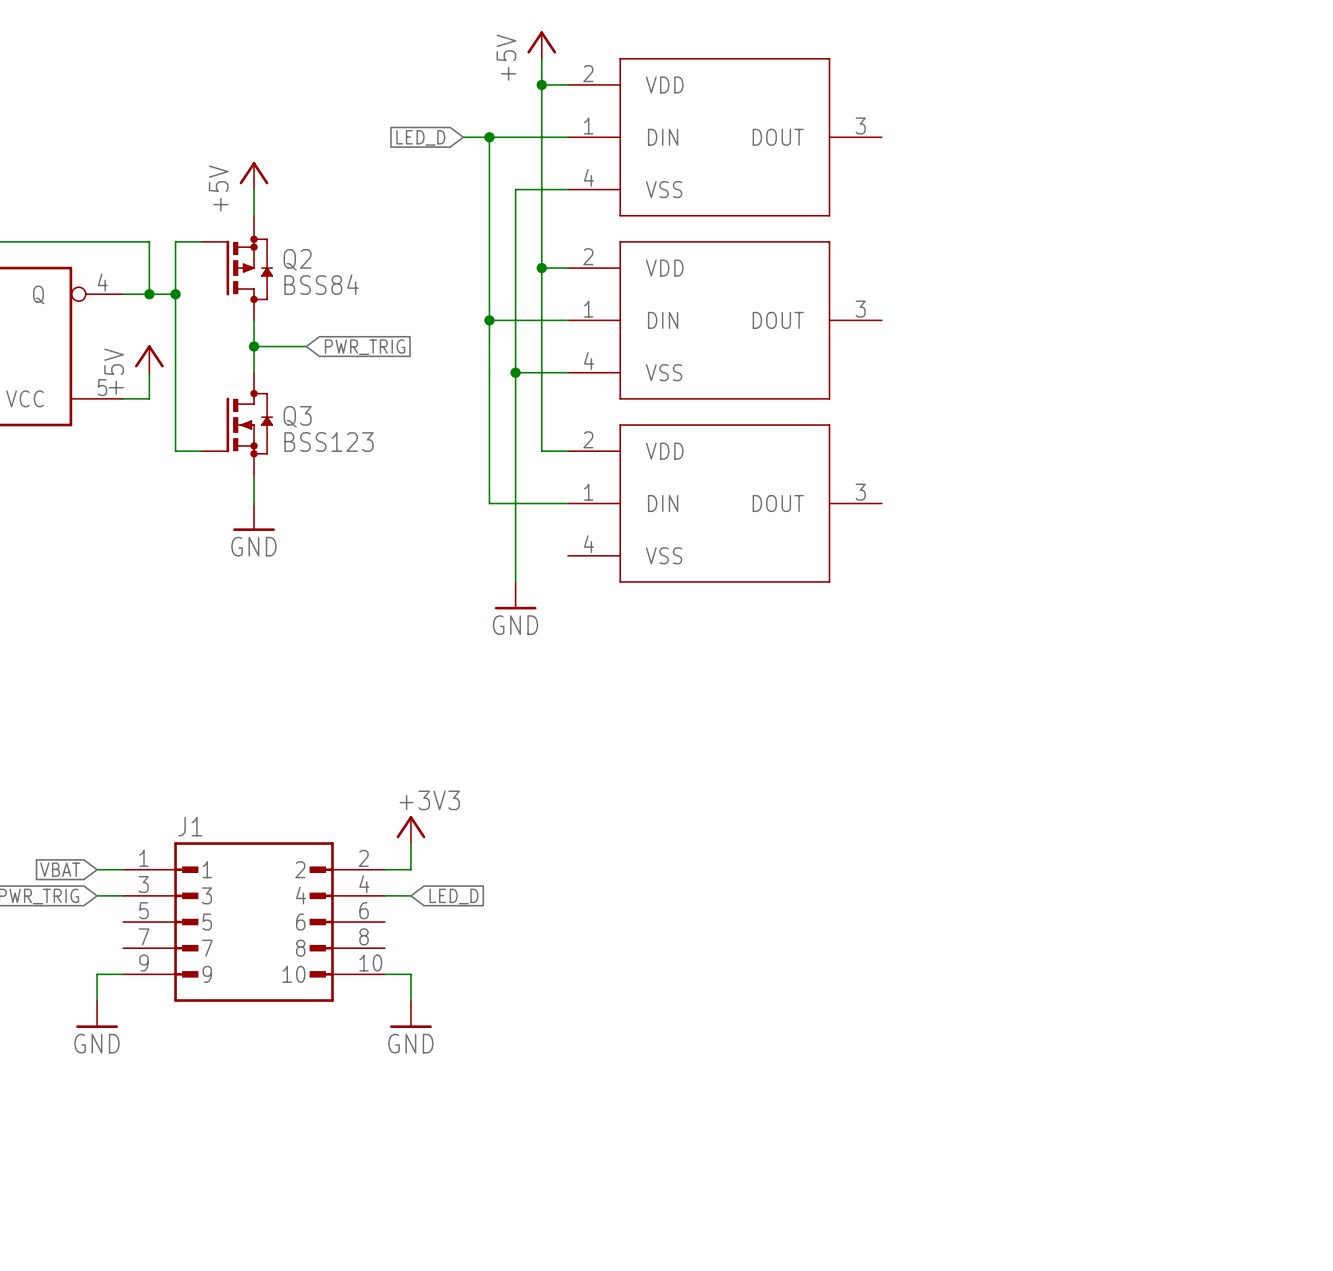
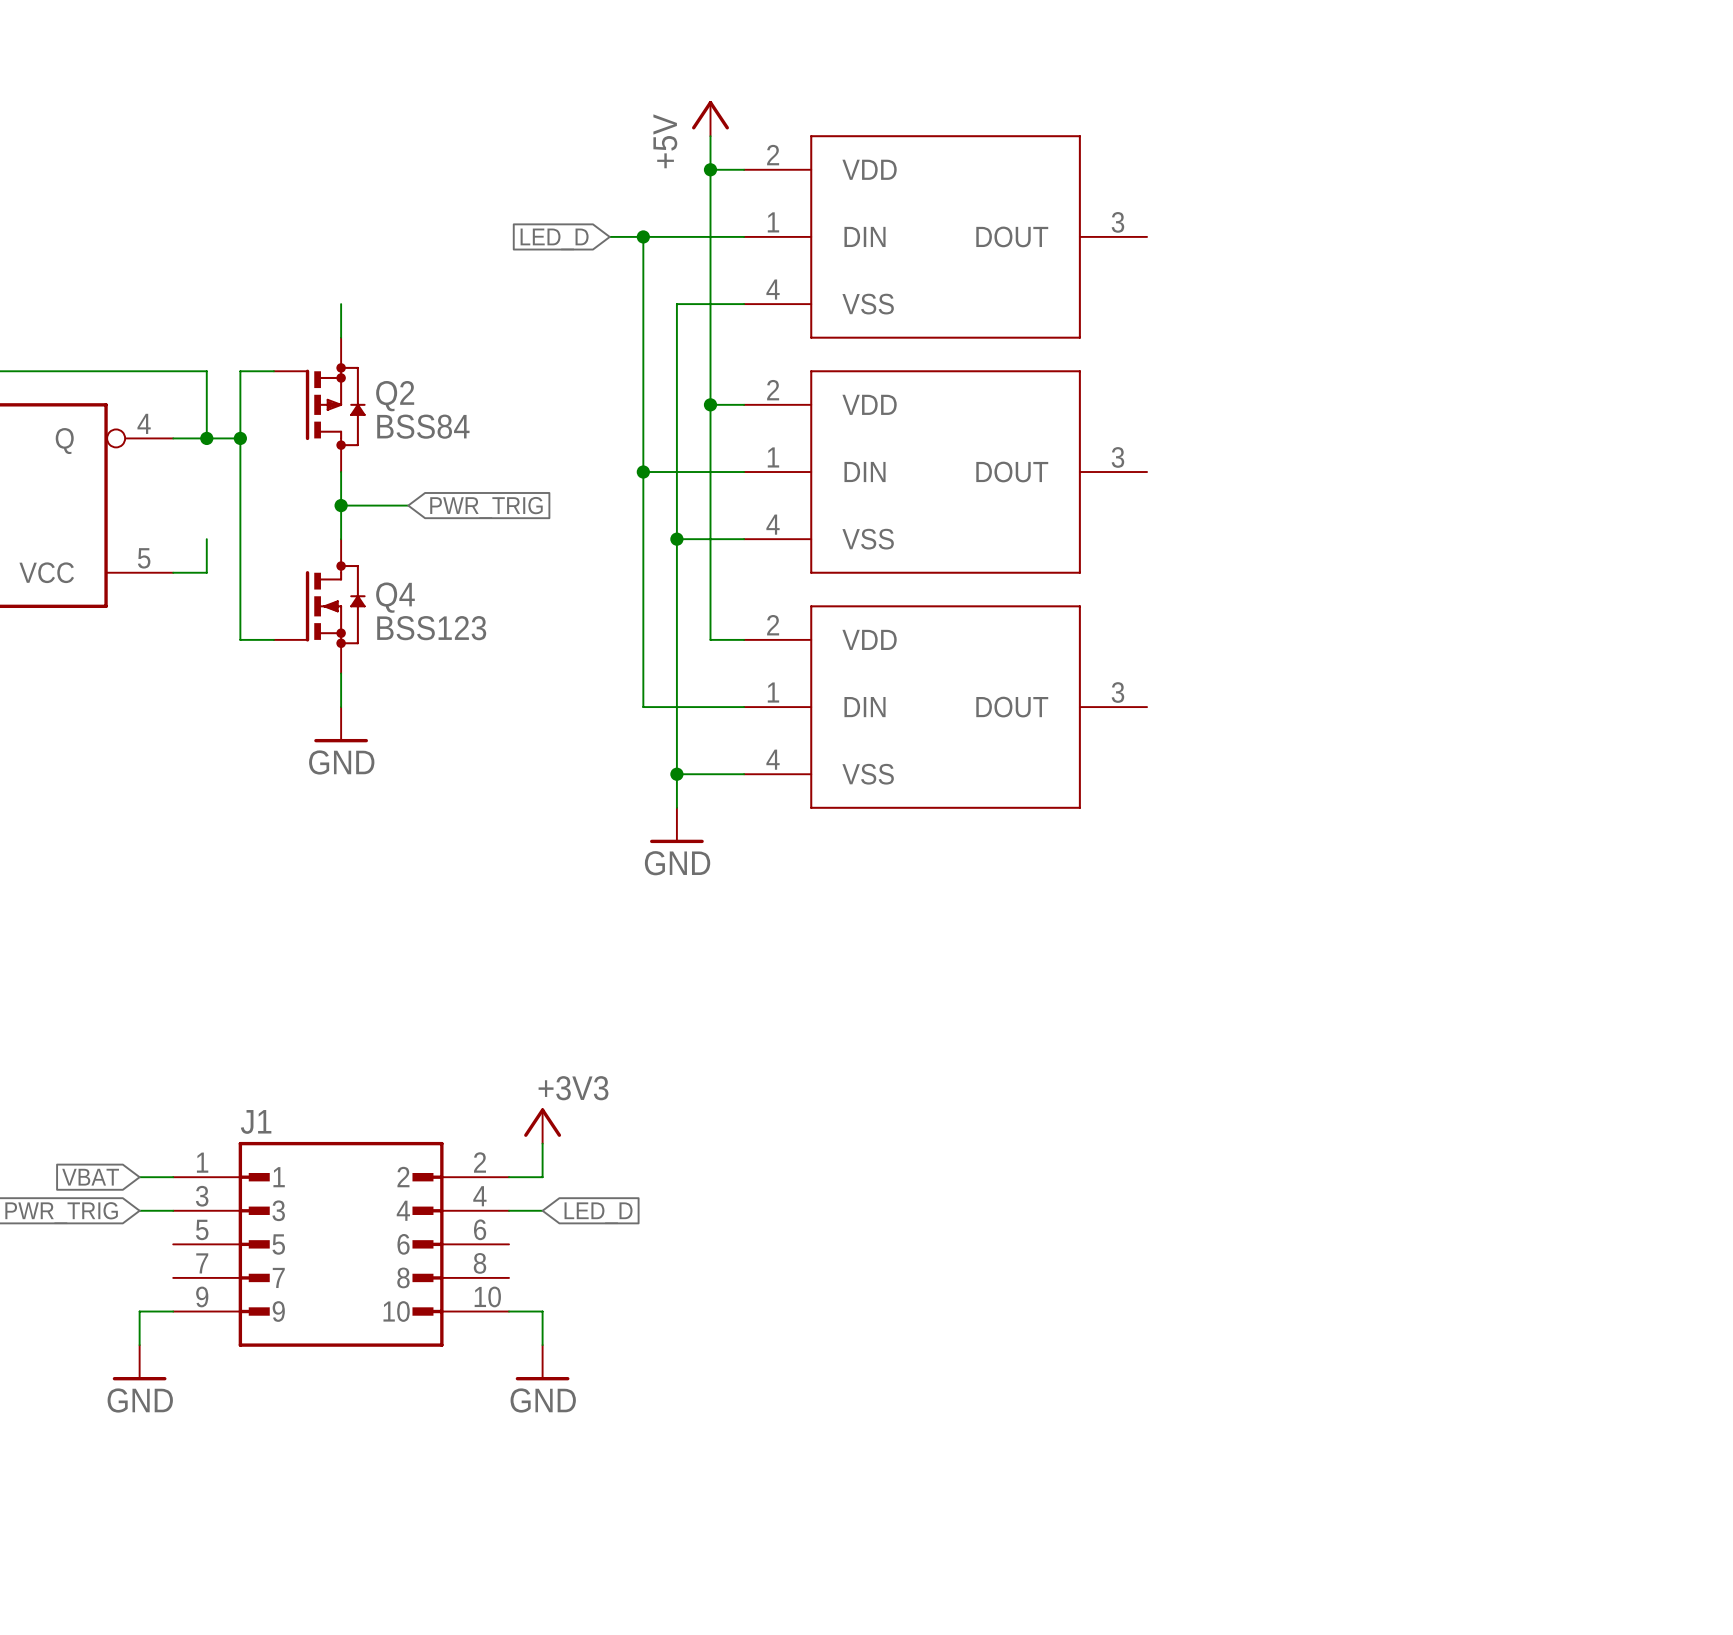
power symbol: +5V (254, 175) -> none
power symbol: +5V (149, 358) -> none
Q3 name: Q3 (297, 416) -> Q4 (395, 597)
wire: none -> (676, 774) (744, 774)
junction: none -> (676, 774)

